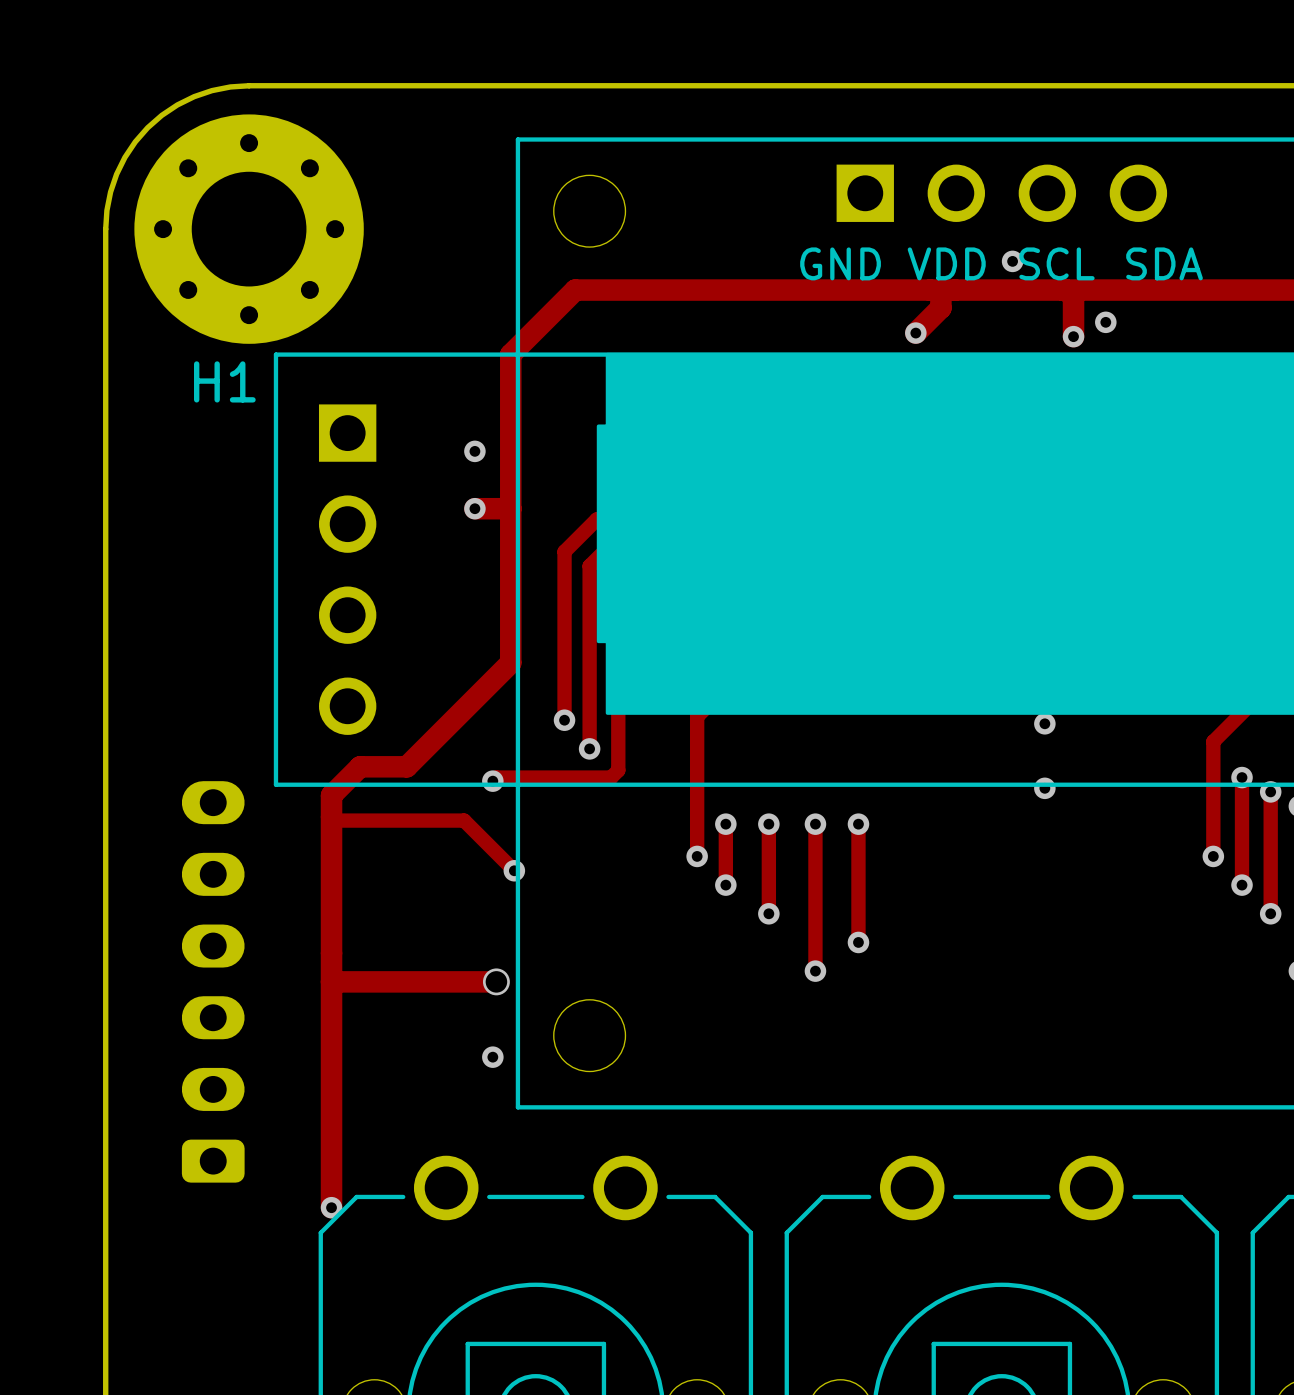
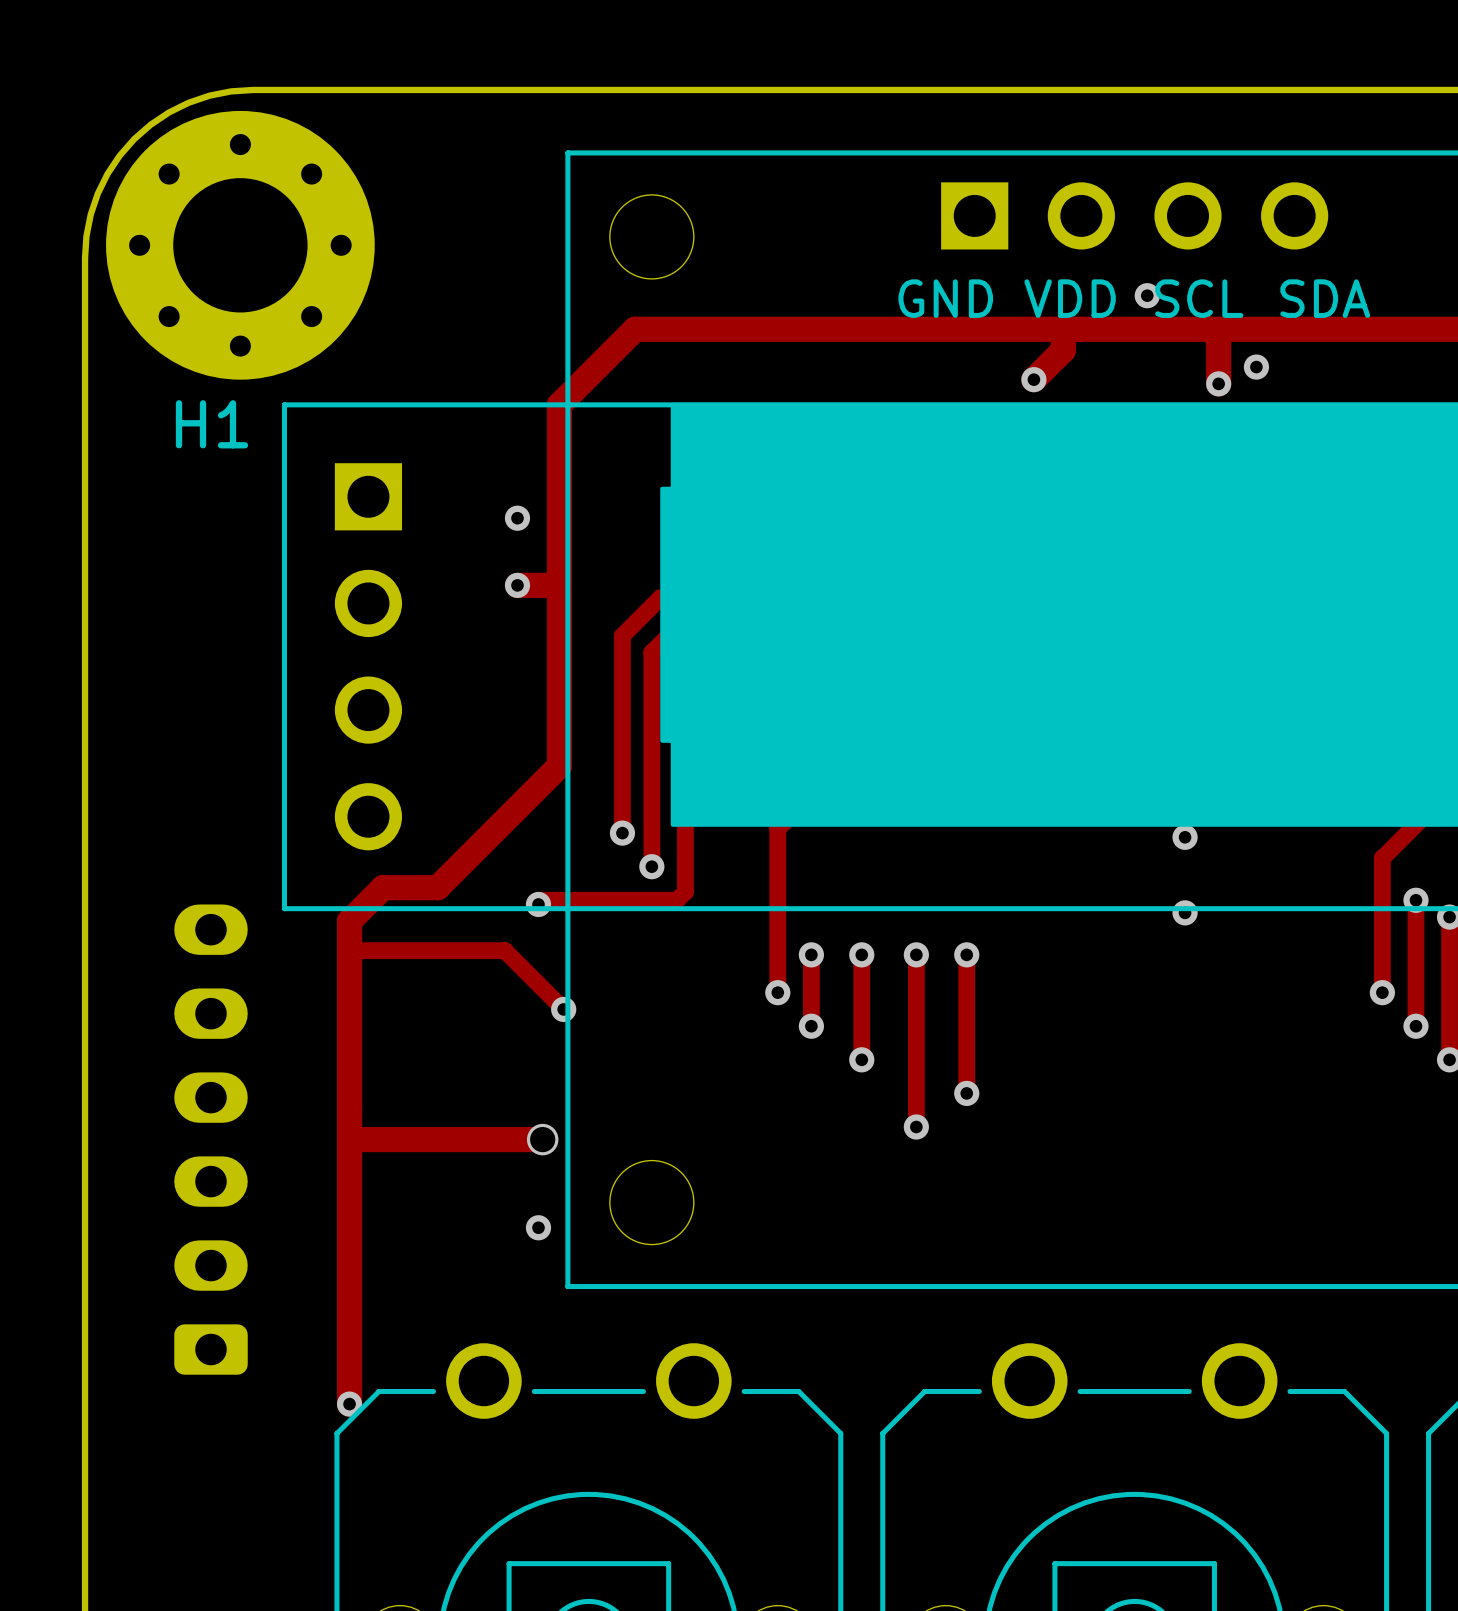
H1 position: (249, 229) -> (240, 245)

